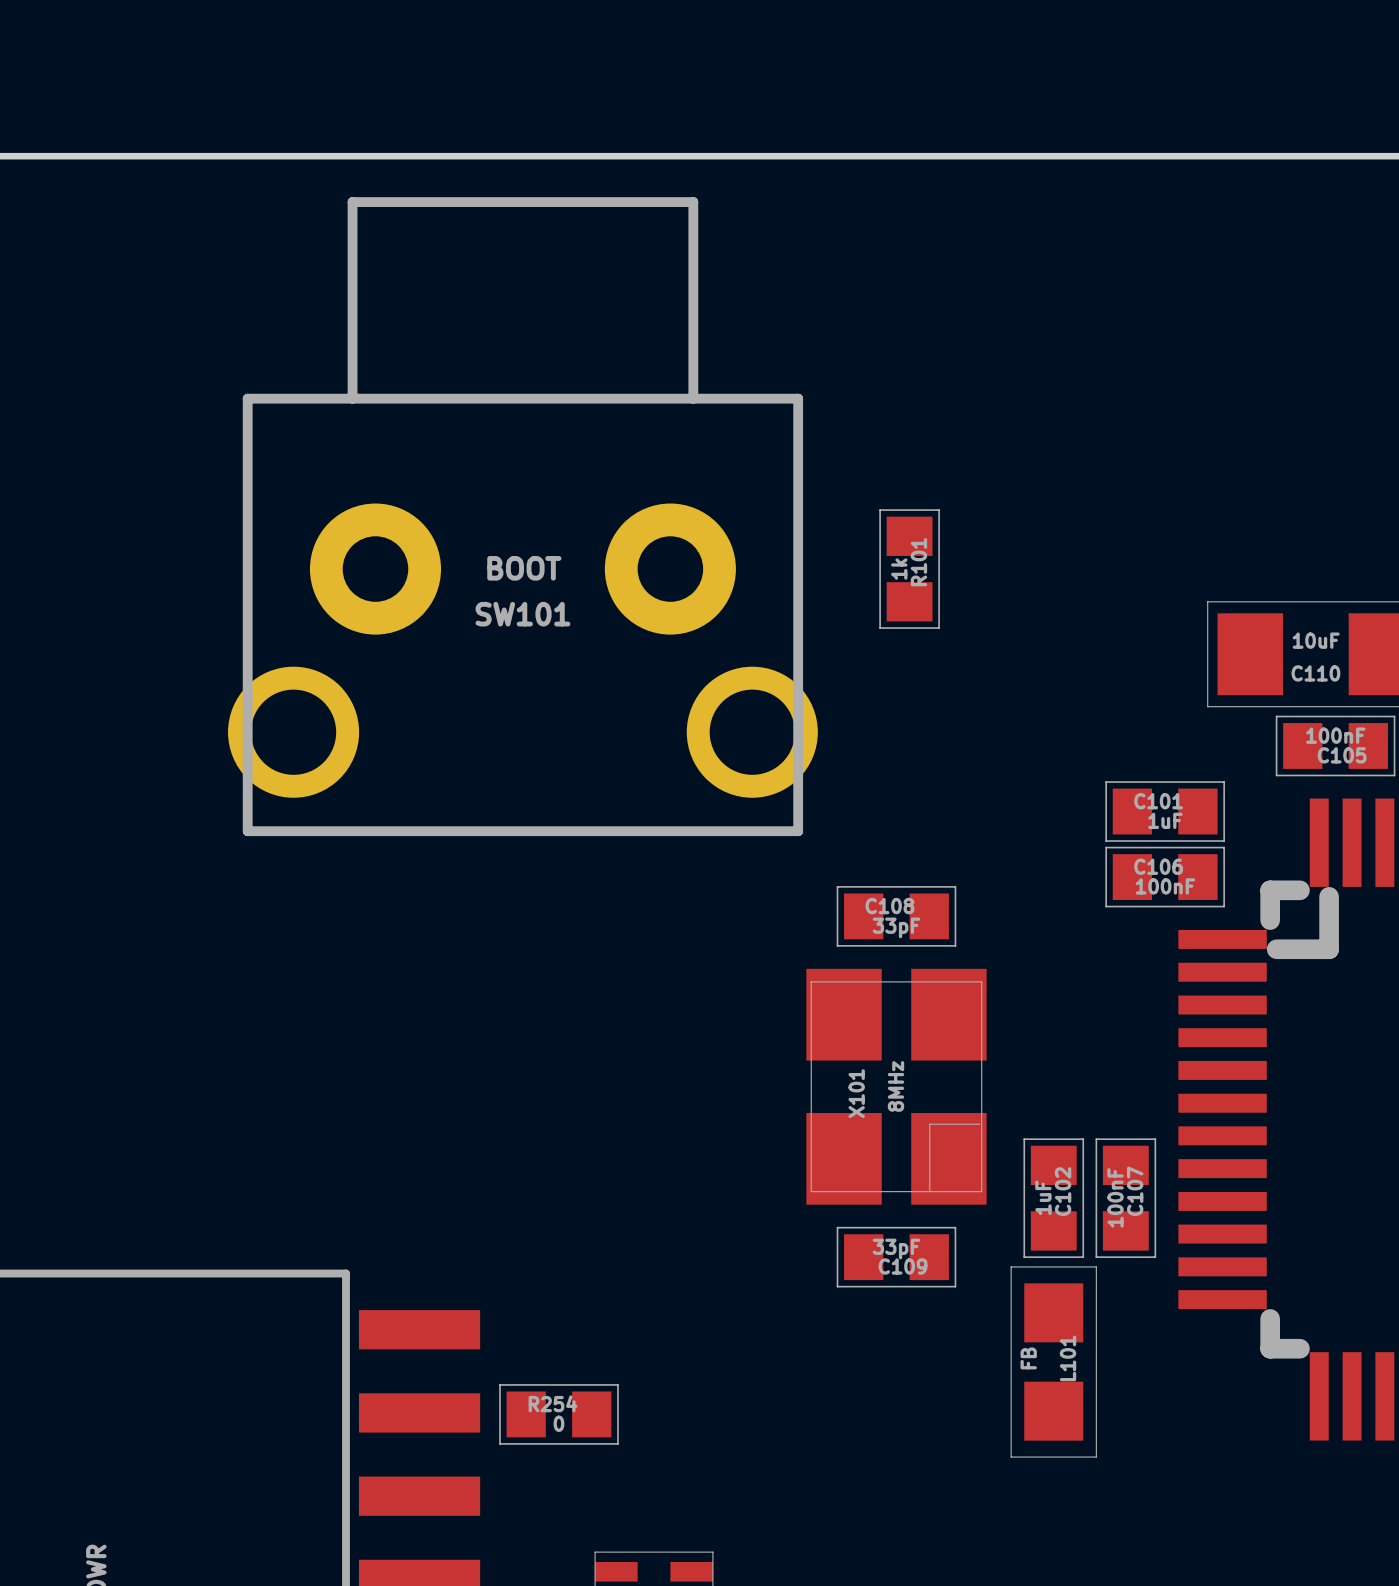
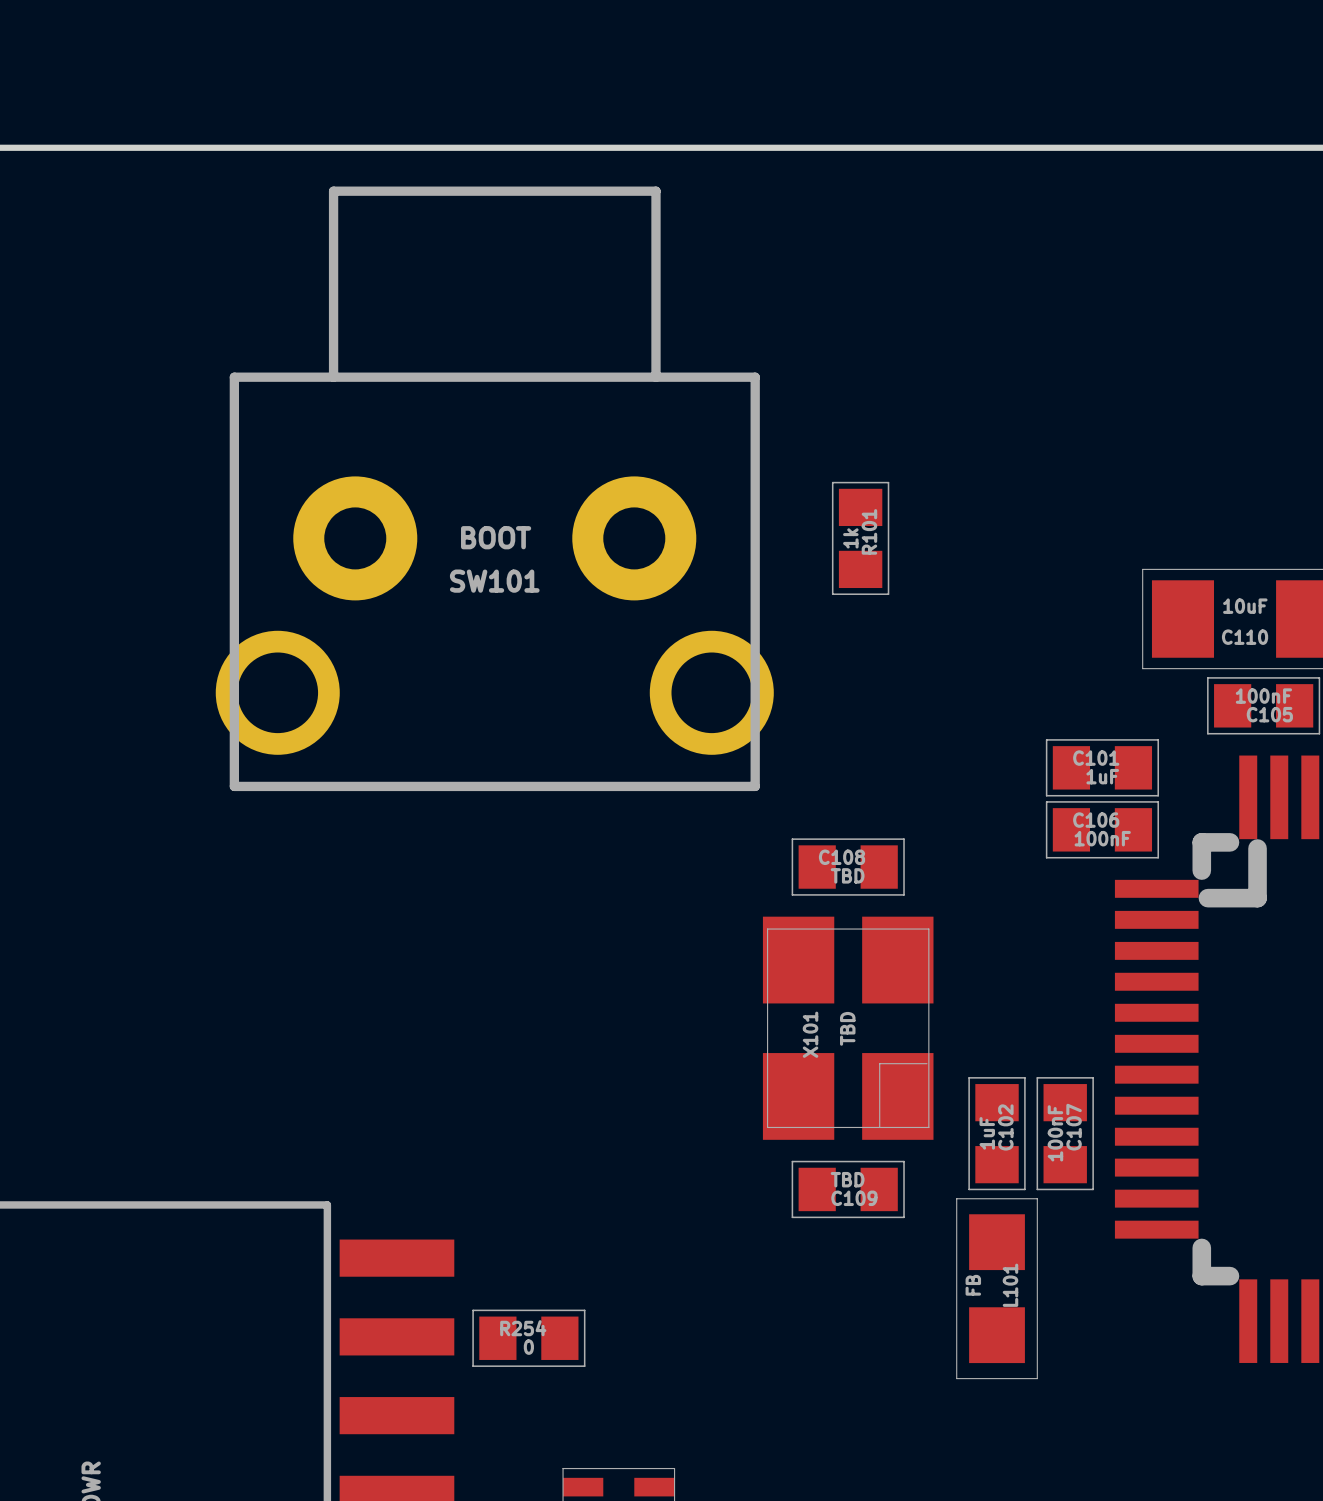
C108 value: 33pF (896, 927) -> TBD (847, 875)
X101 value: 8MHz (895, 1086) -> TBD (847, 1028)
C109 value: 33pF (896, 1249) -> TBD (847, 1179)

